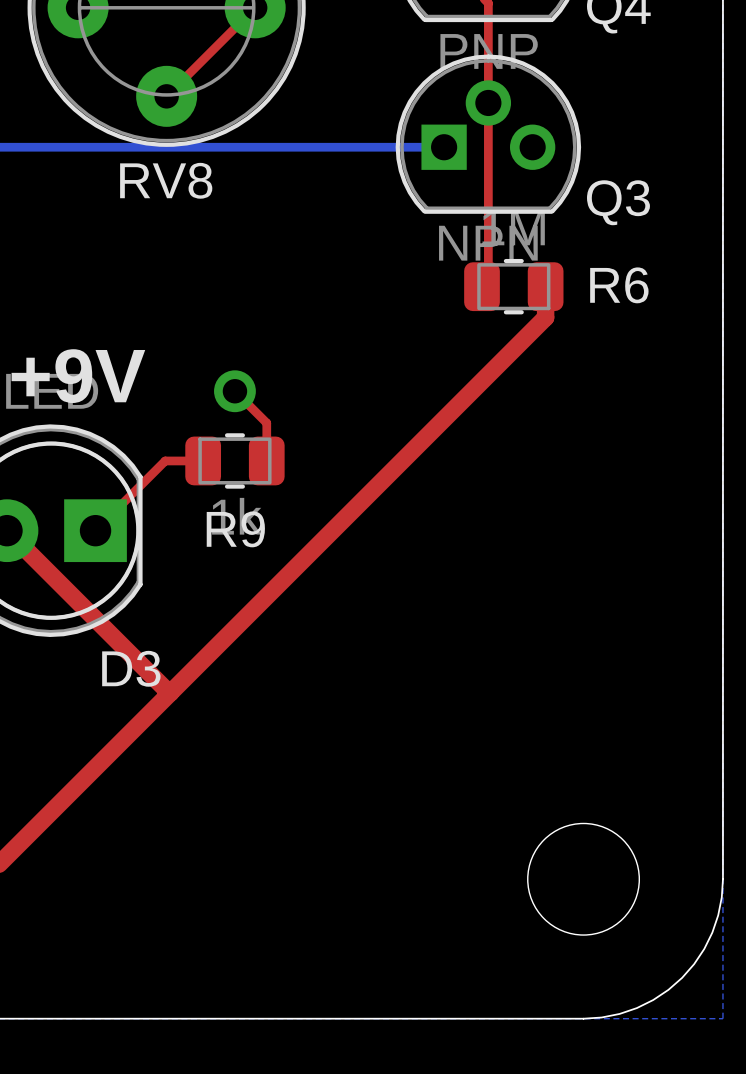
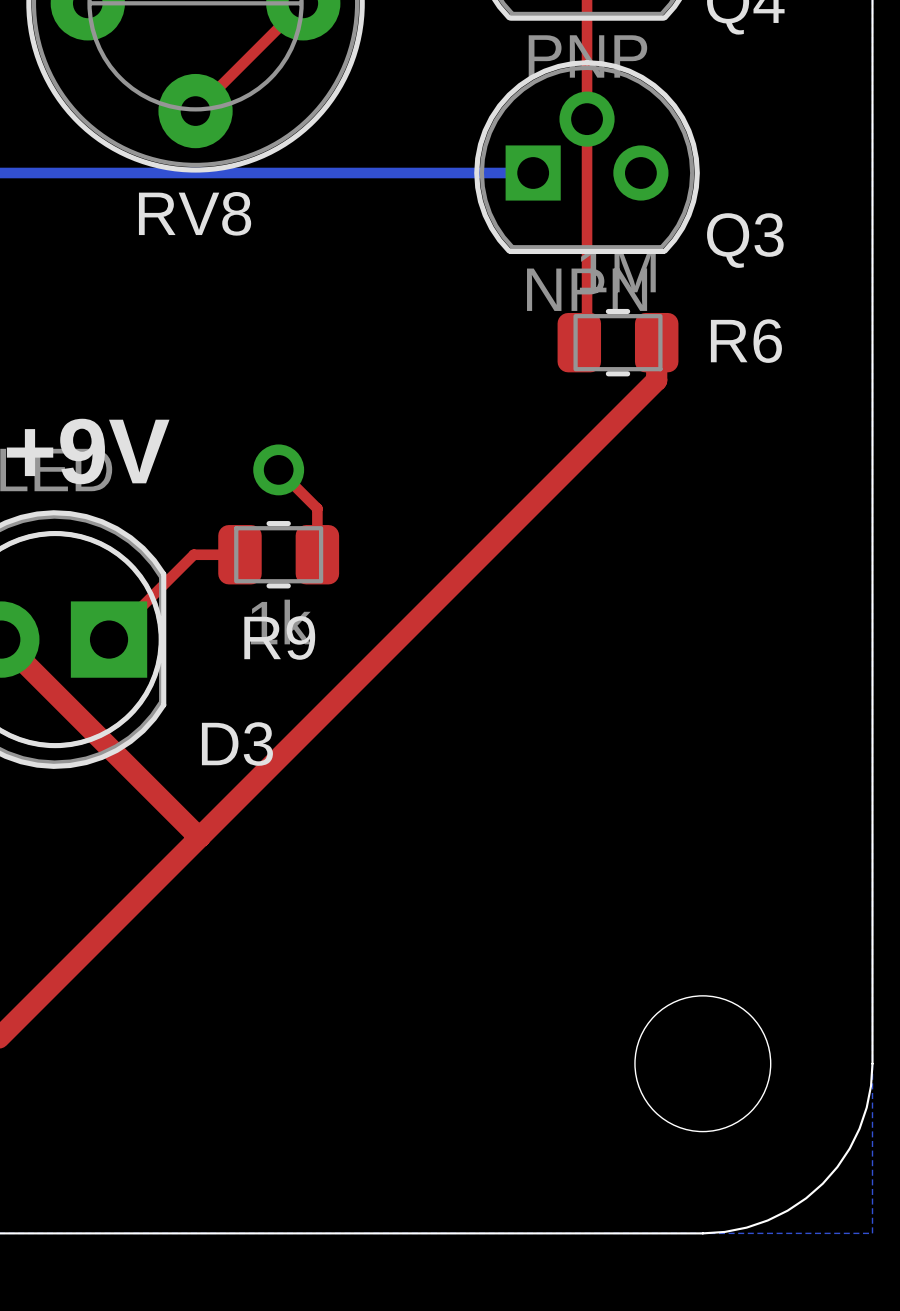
D3 name position: D3 (131, 668) -> D3 (237, 744)

